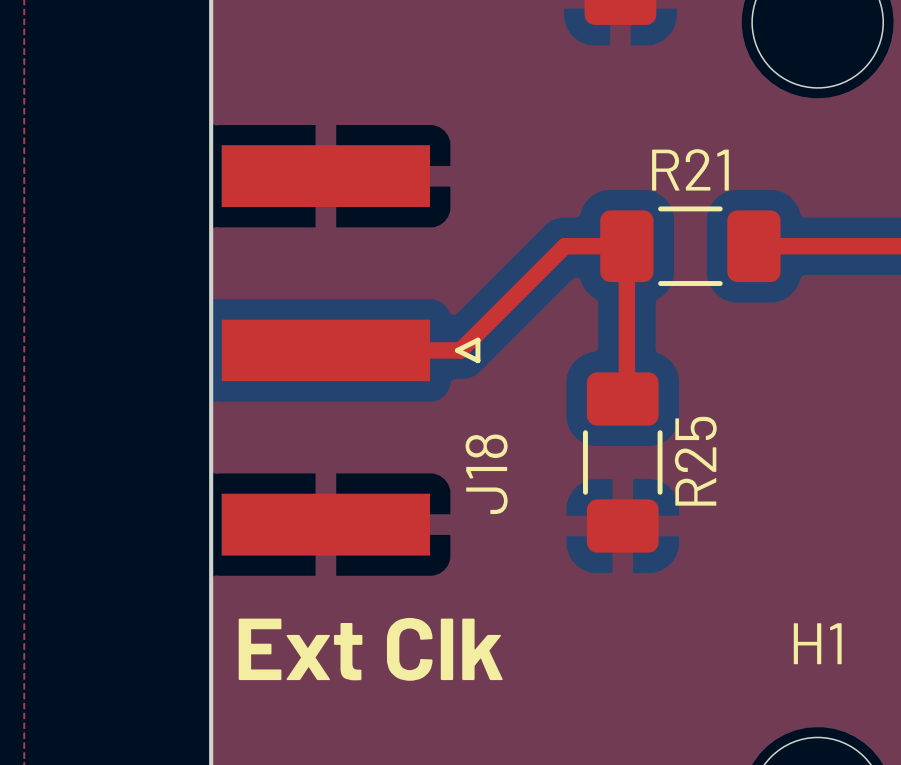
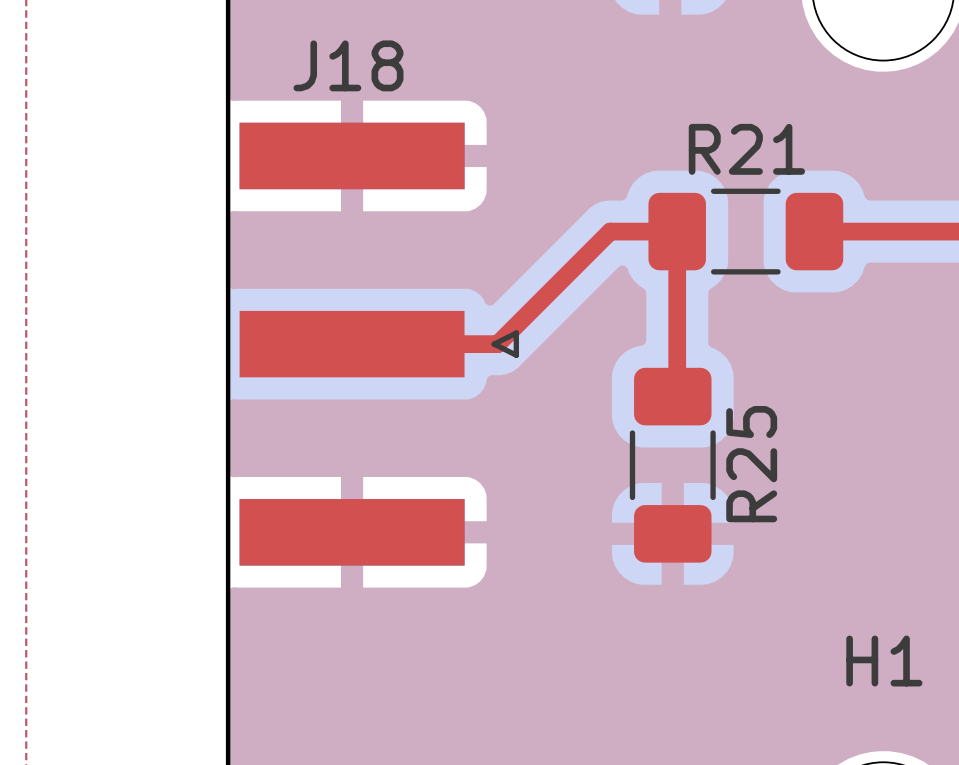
J18 name rotation: 0° (486, 474) -> 90° clockwise (348, 65)
J18 name position: J18 (486, 474) -> J18 (348, 65)
text: Ext Clk (370, 649) -> none

